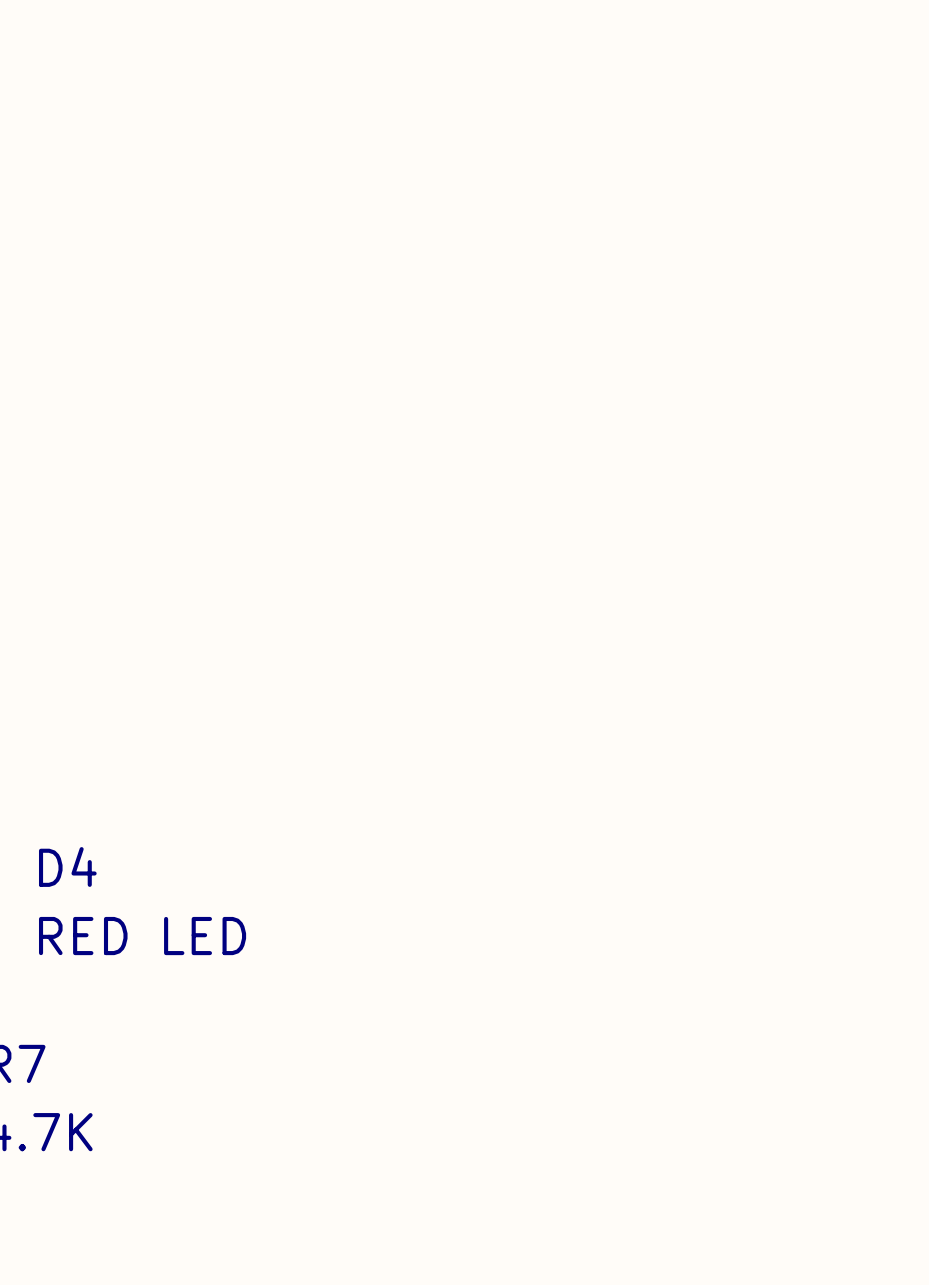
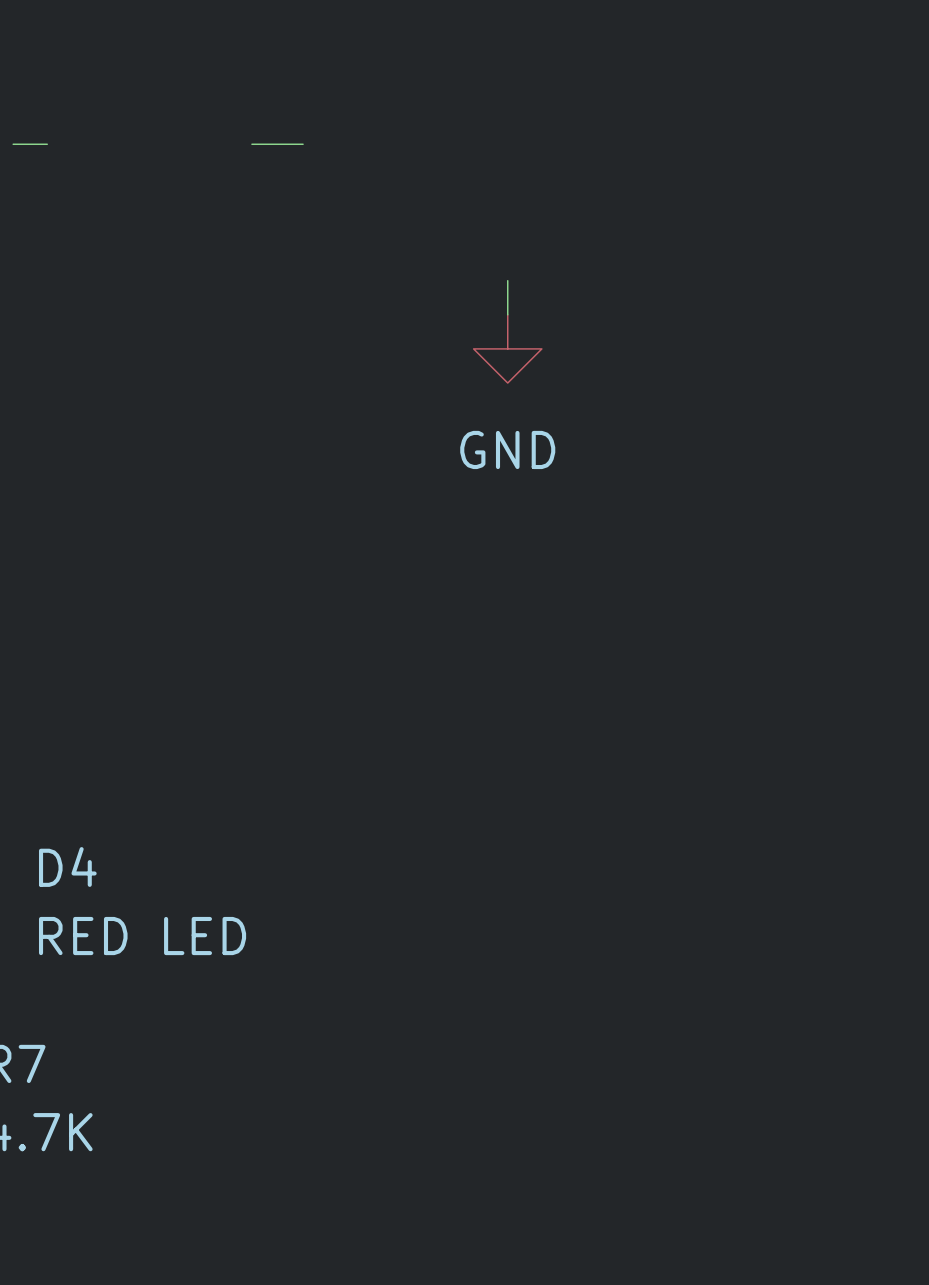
wire: none -> (13, 144) (47, 144)
wire: none -> (251, 144) (303, 144)
wire: none -> (507, 280) (507, 314)
power symbol: none -> GND (507, 348)

